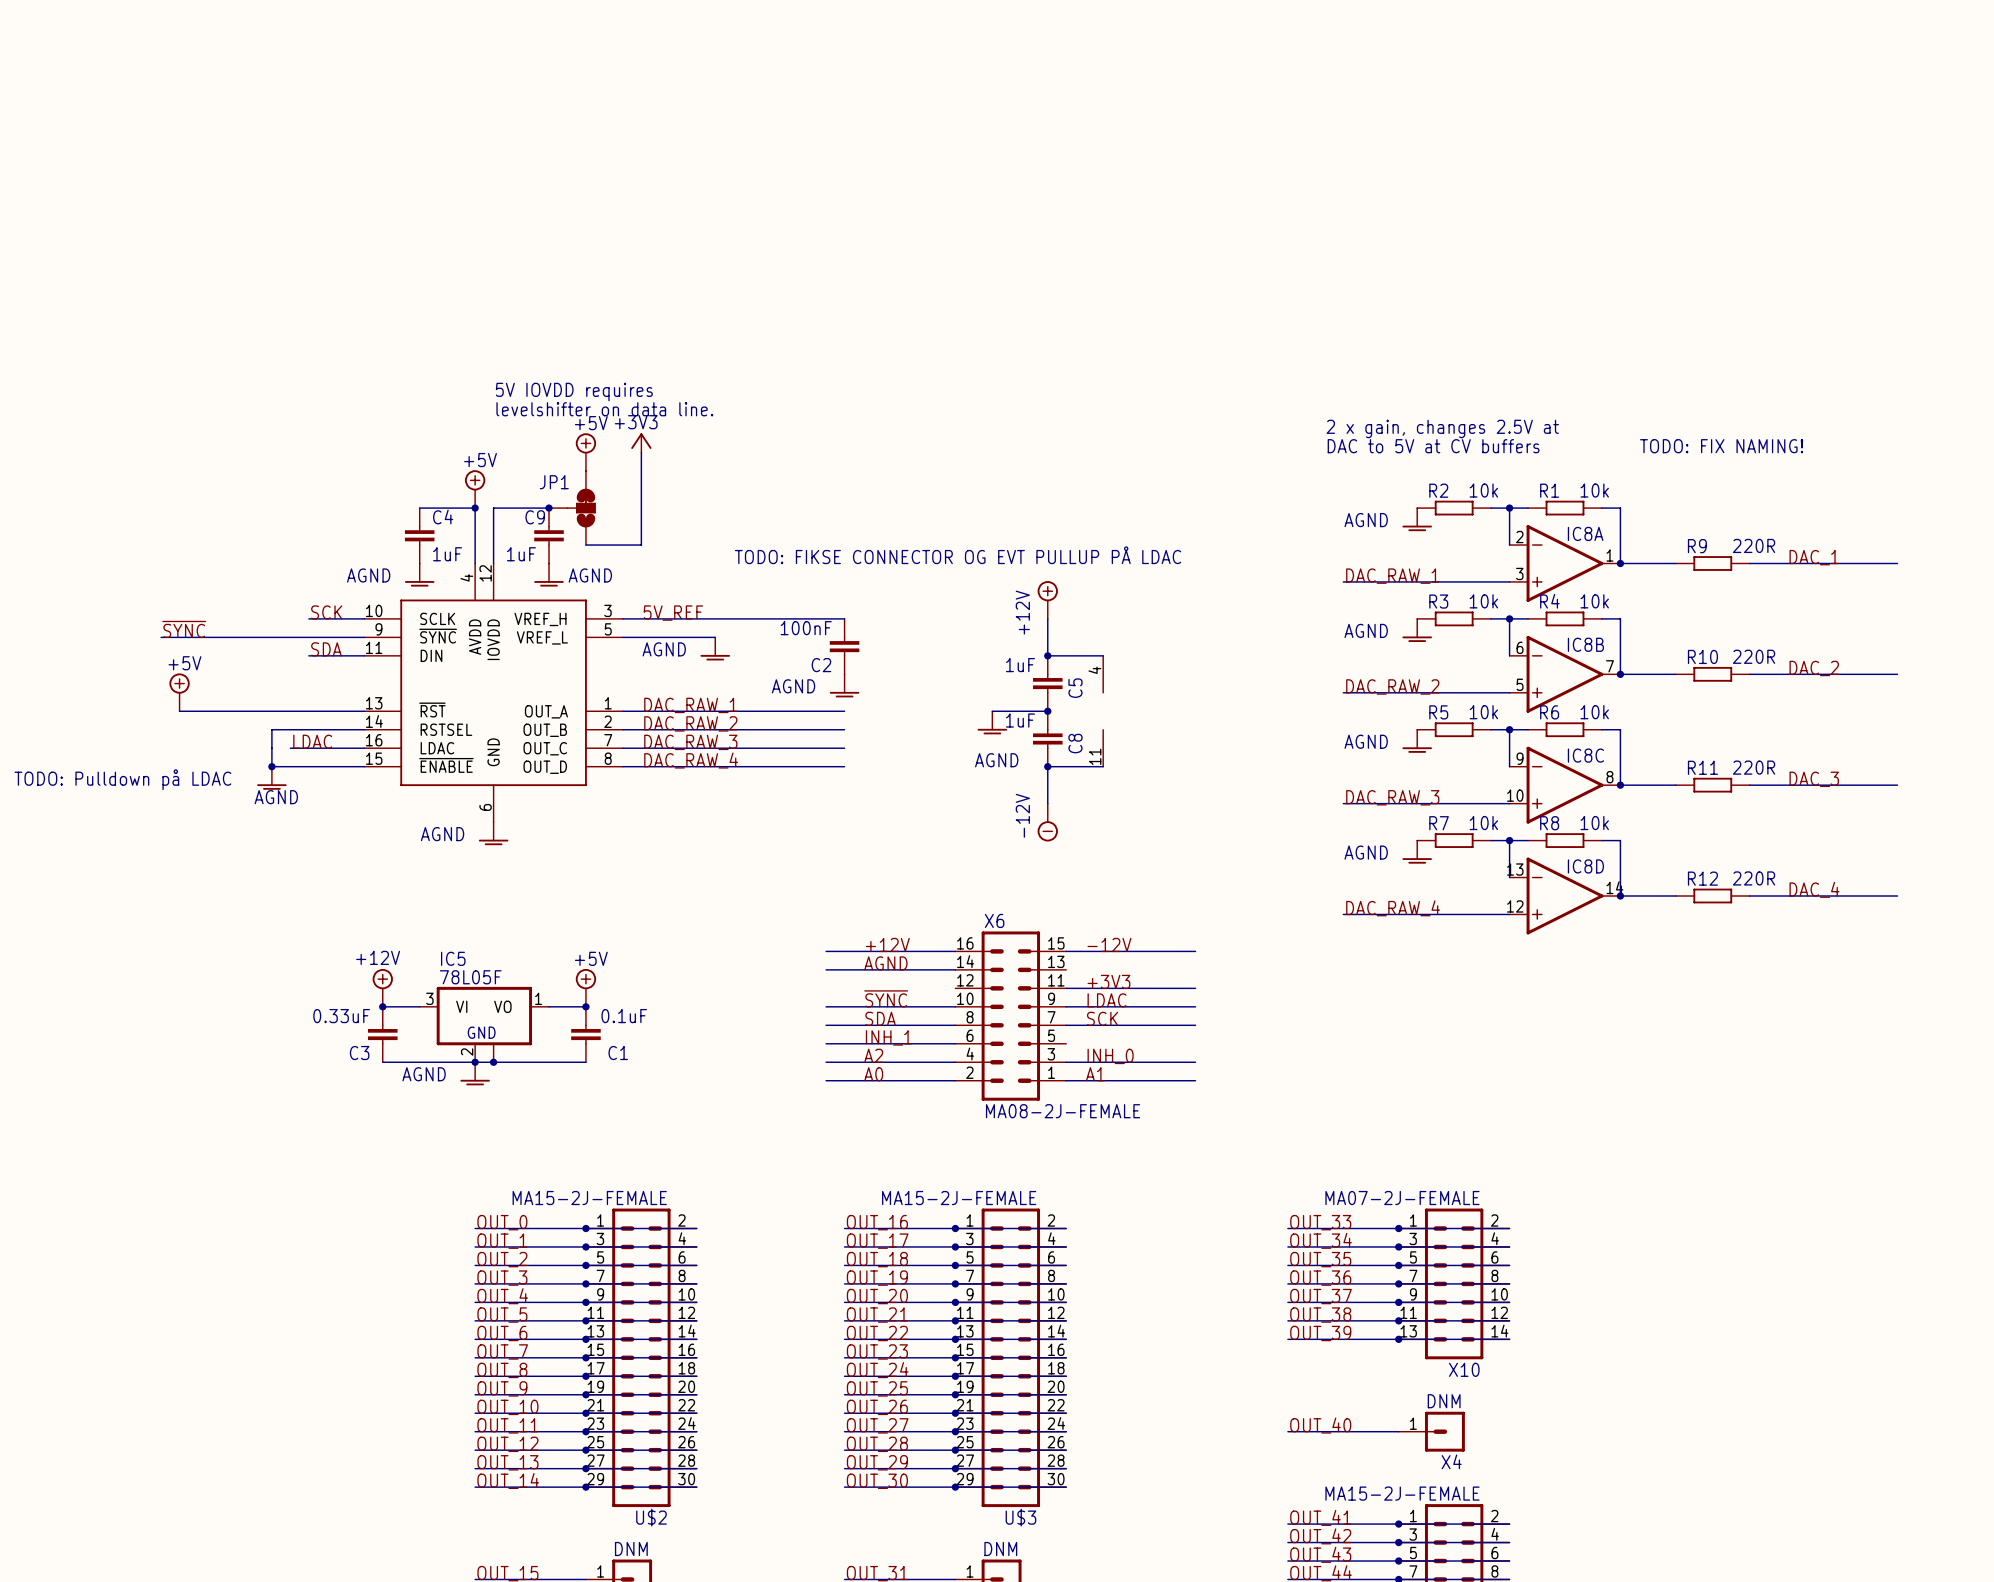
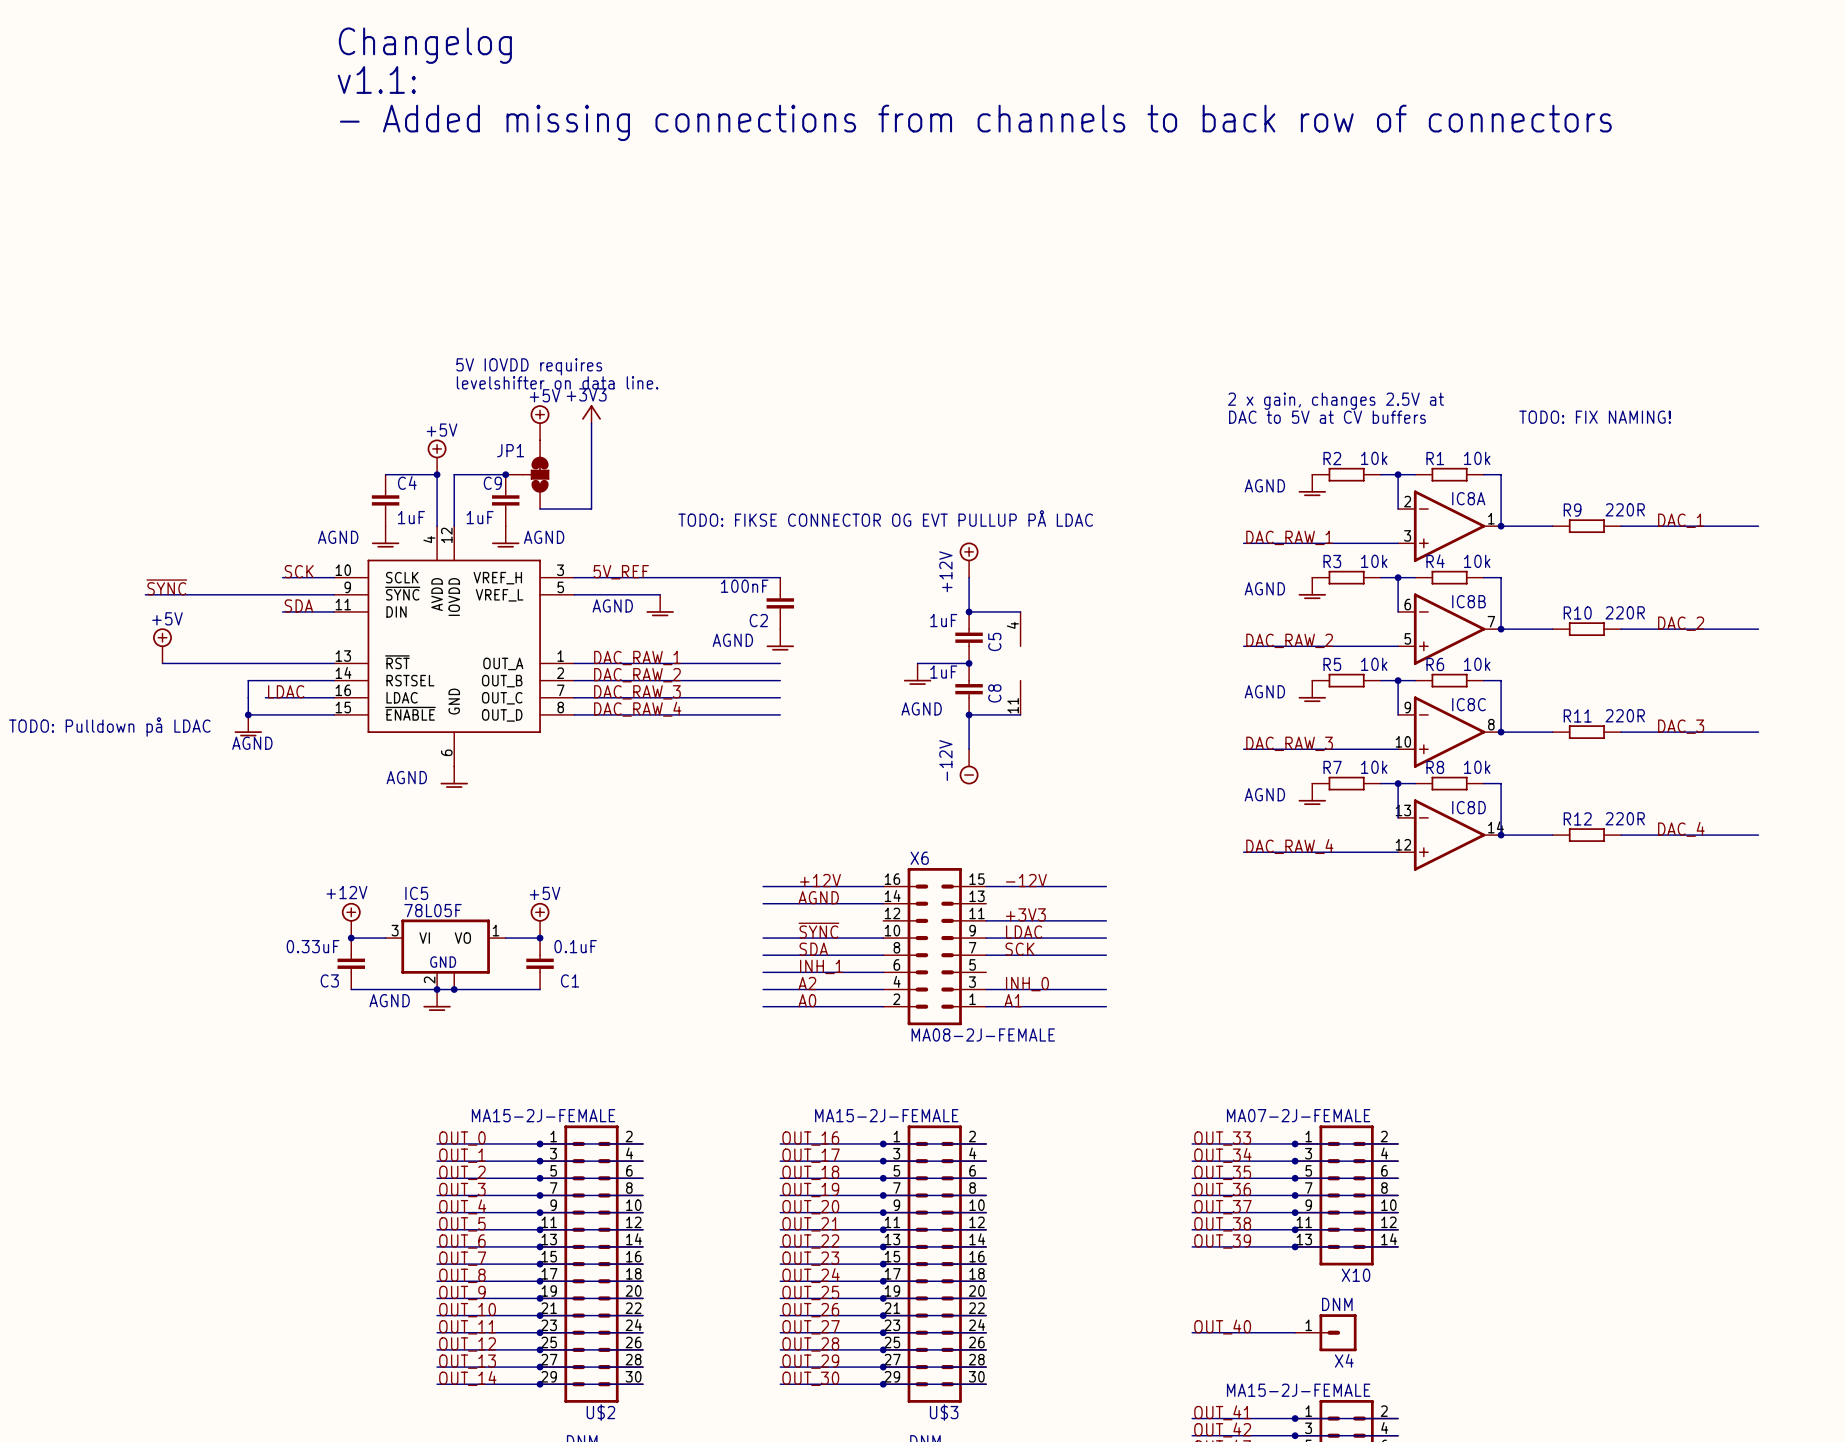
text: none -> Changelog (425, 45)
text: none -> v1.1: (376, 79)
text: none -> - Added missing connections from channels to back row of connectors (975, 122)

